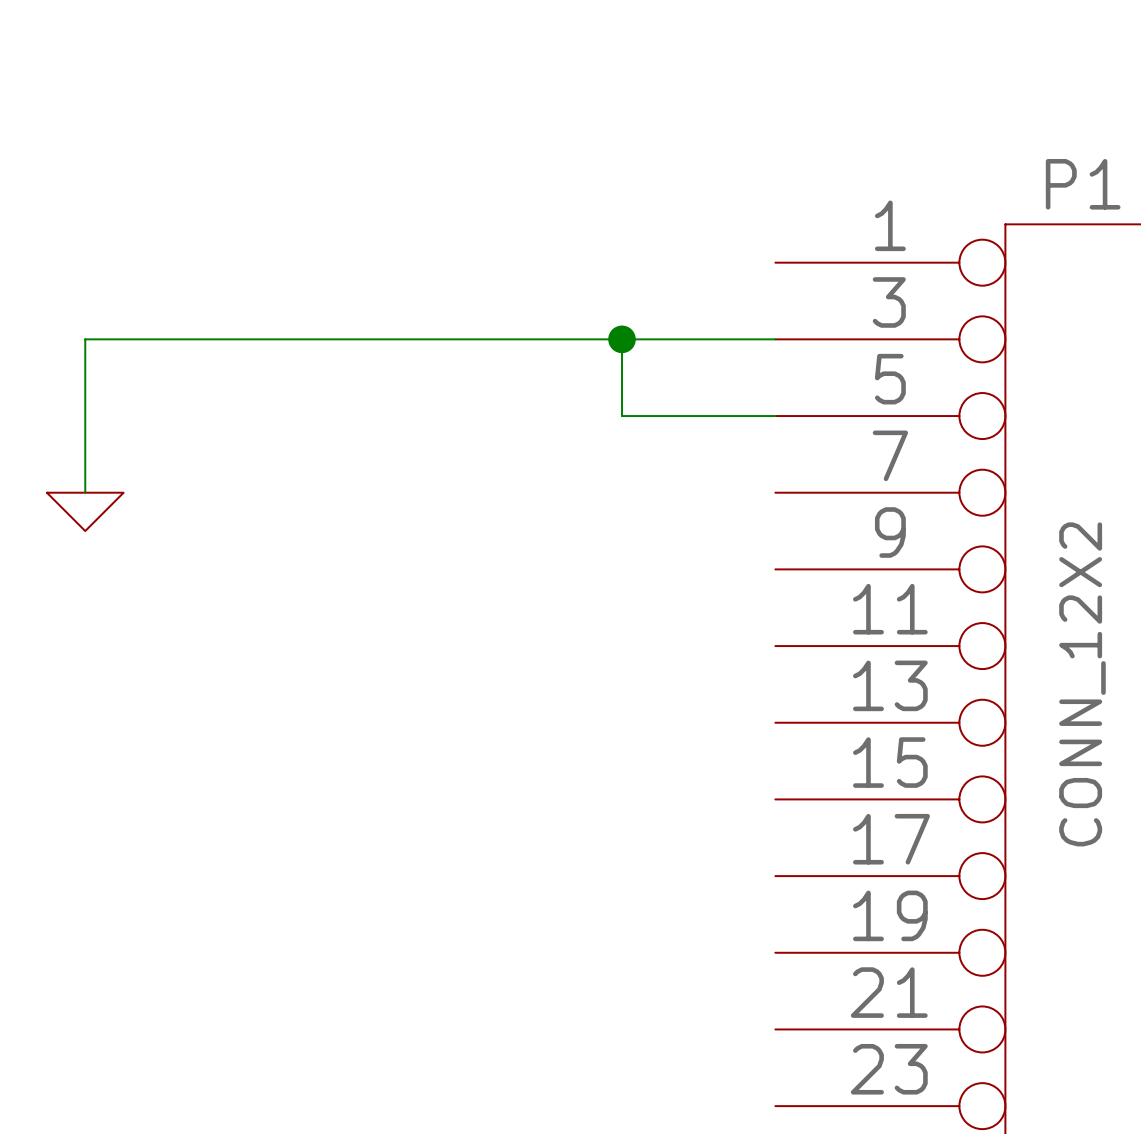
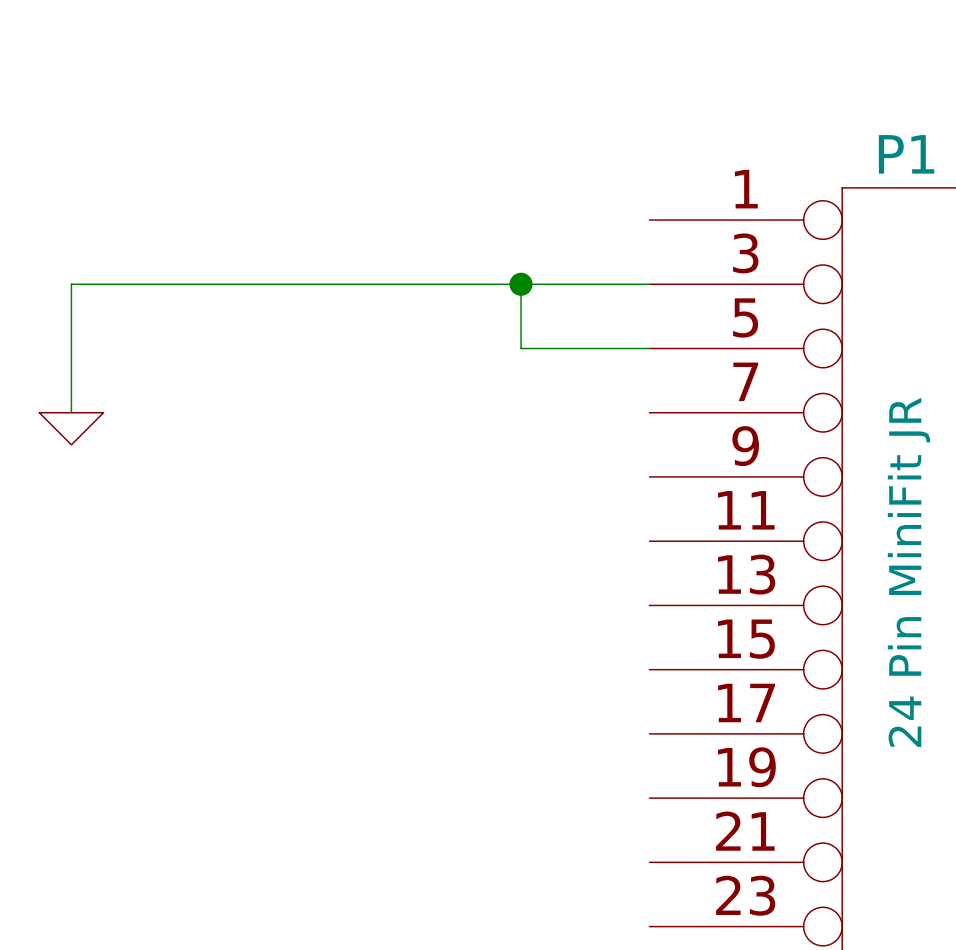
P1 value: CONN_12X2 (1082, 684) -> 24 Pin MiniFit JR (908, 572)

